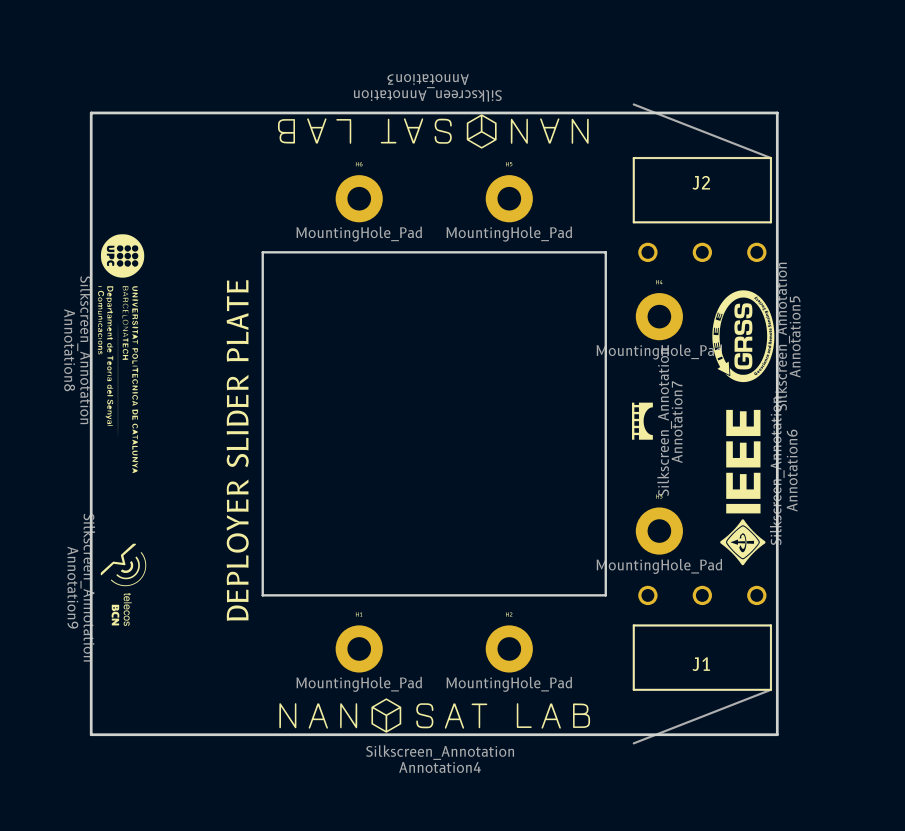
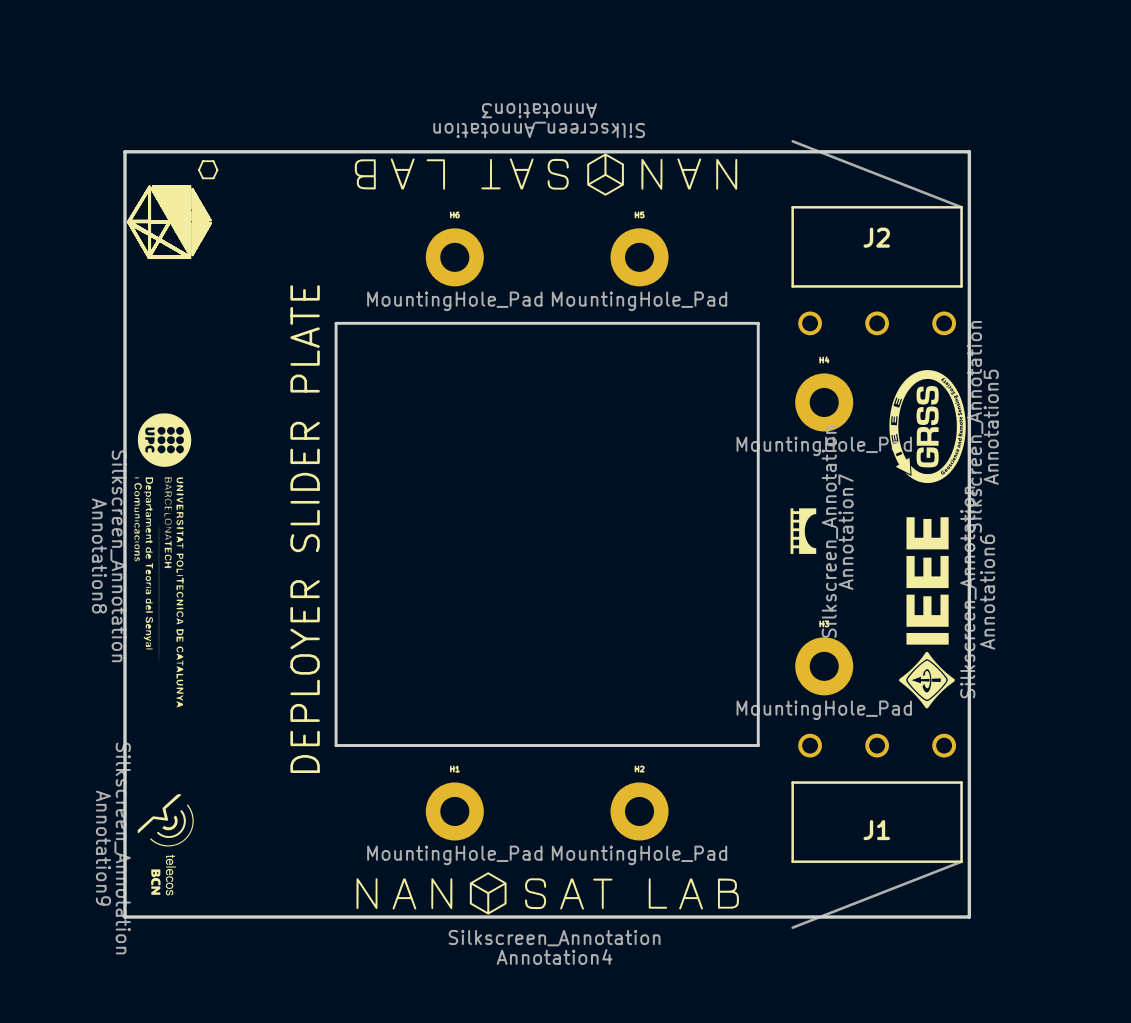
drawing: none -> [127, 160, 219, 259]
Annotation8 position: (120, 353) -> (162, 560)
Annotation9 position: (123, 584) -> (165, 844)

